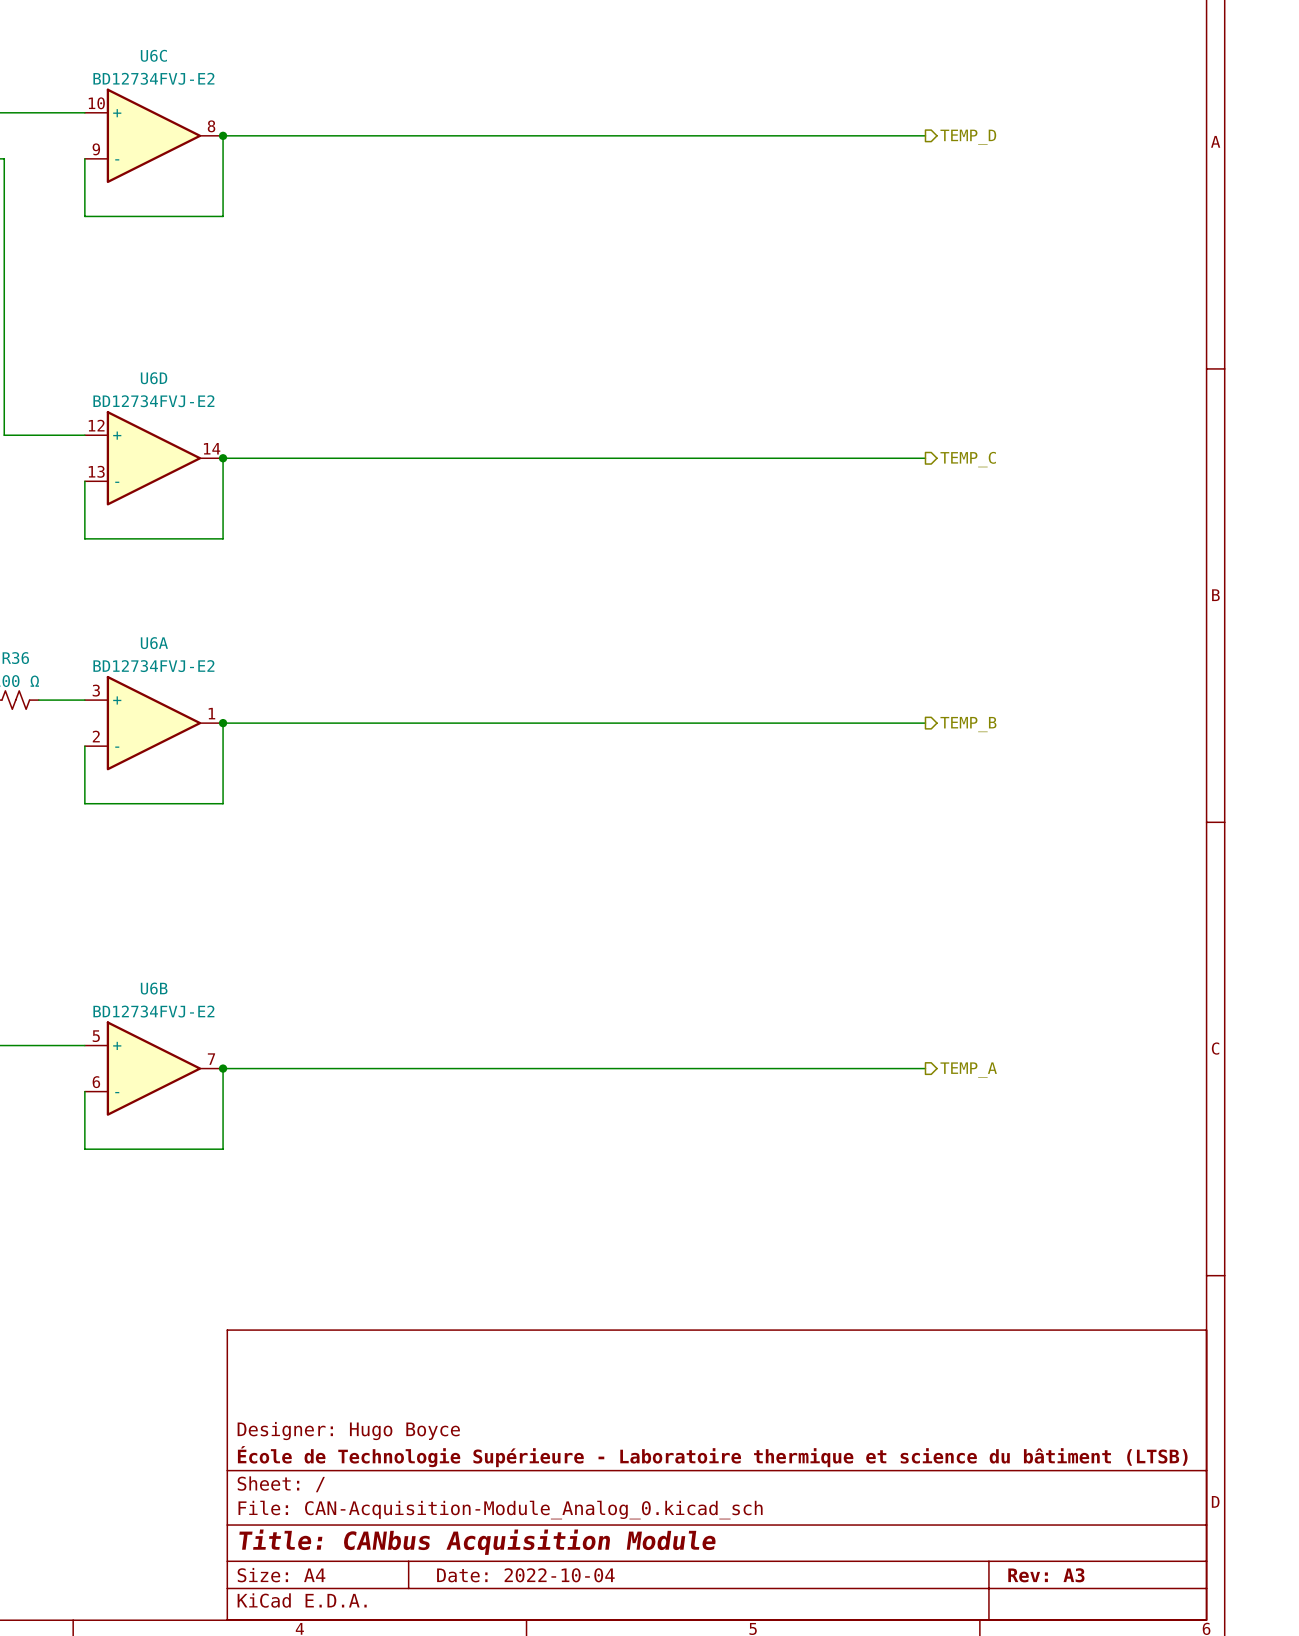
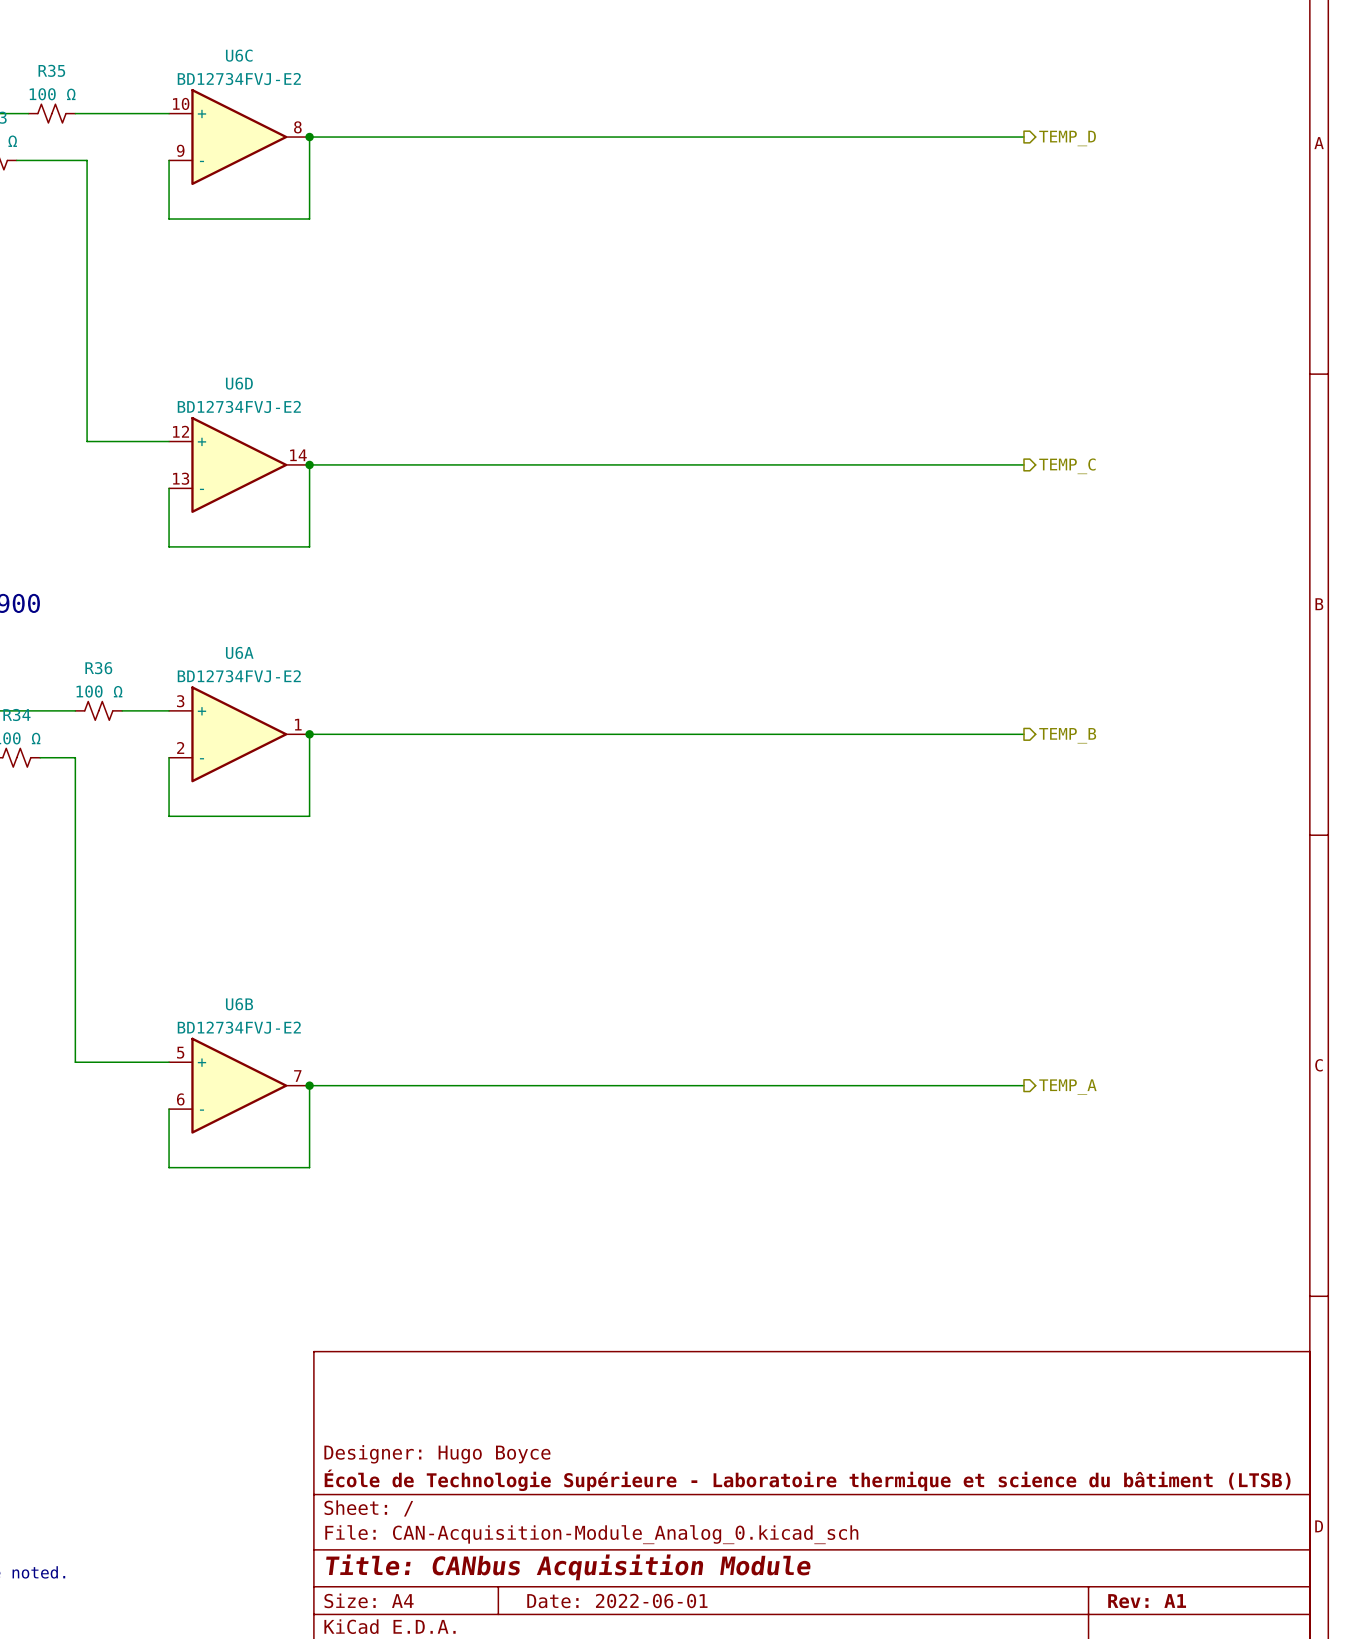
title block: Date: 2022-10-04 (525, 1575) -> Date: 2022-06-01 (617, 1601)
title block: Rev: A3 (1046, 1575) -> Rev: A1 (1147, 1601)

